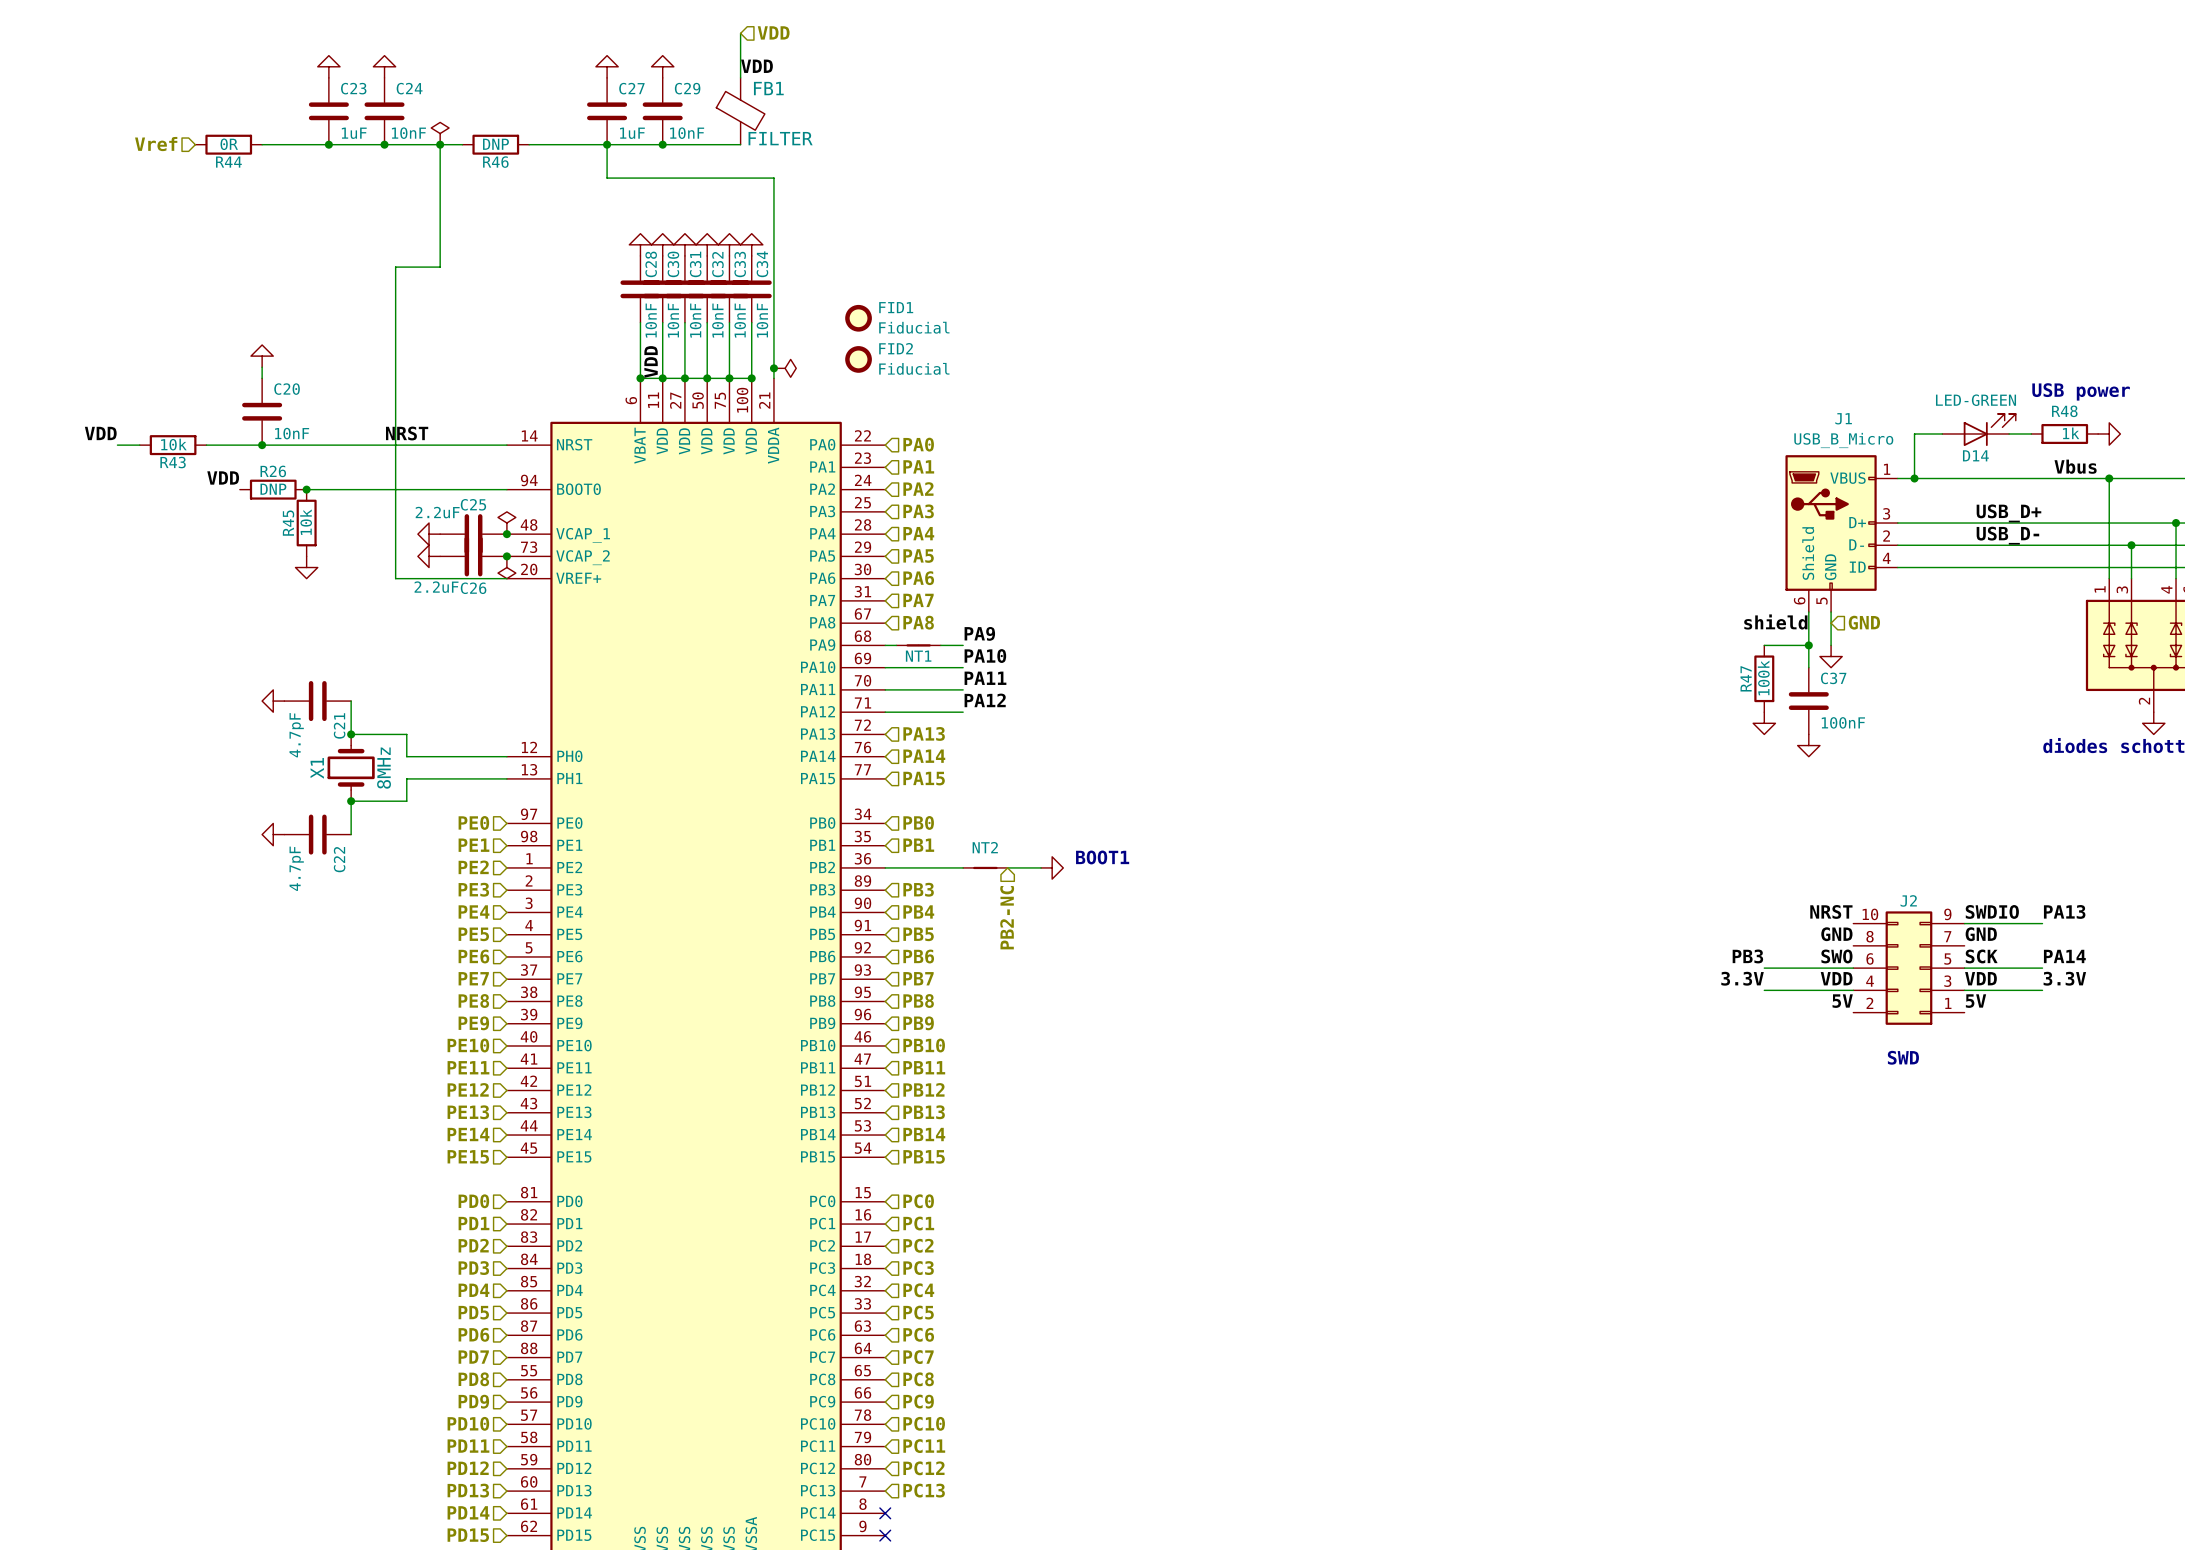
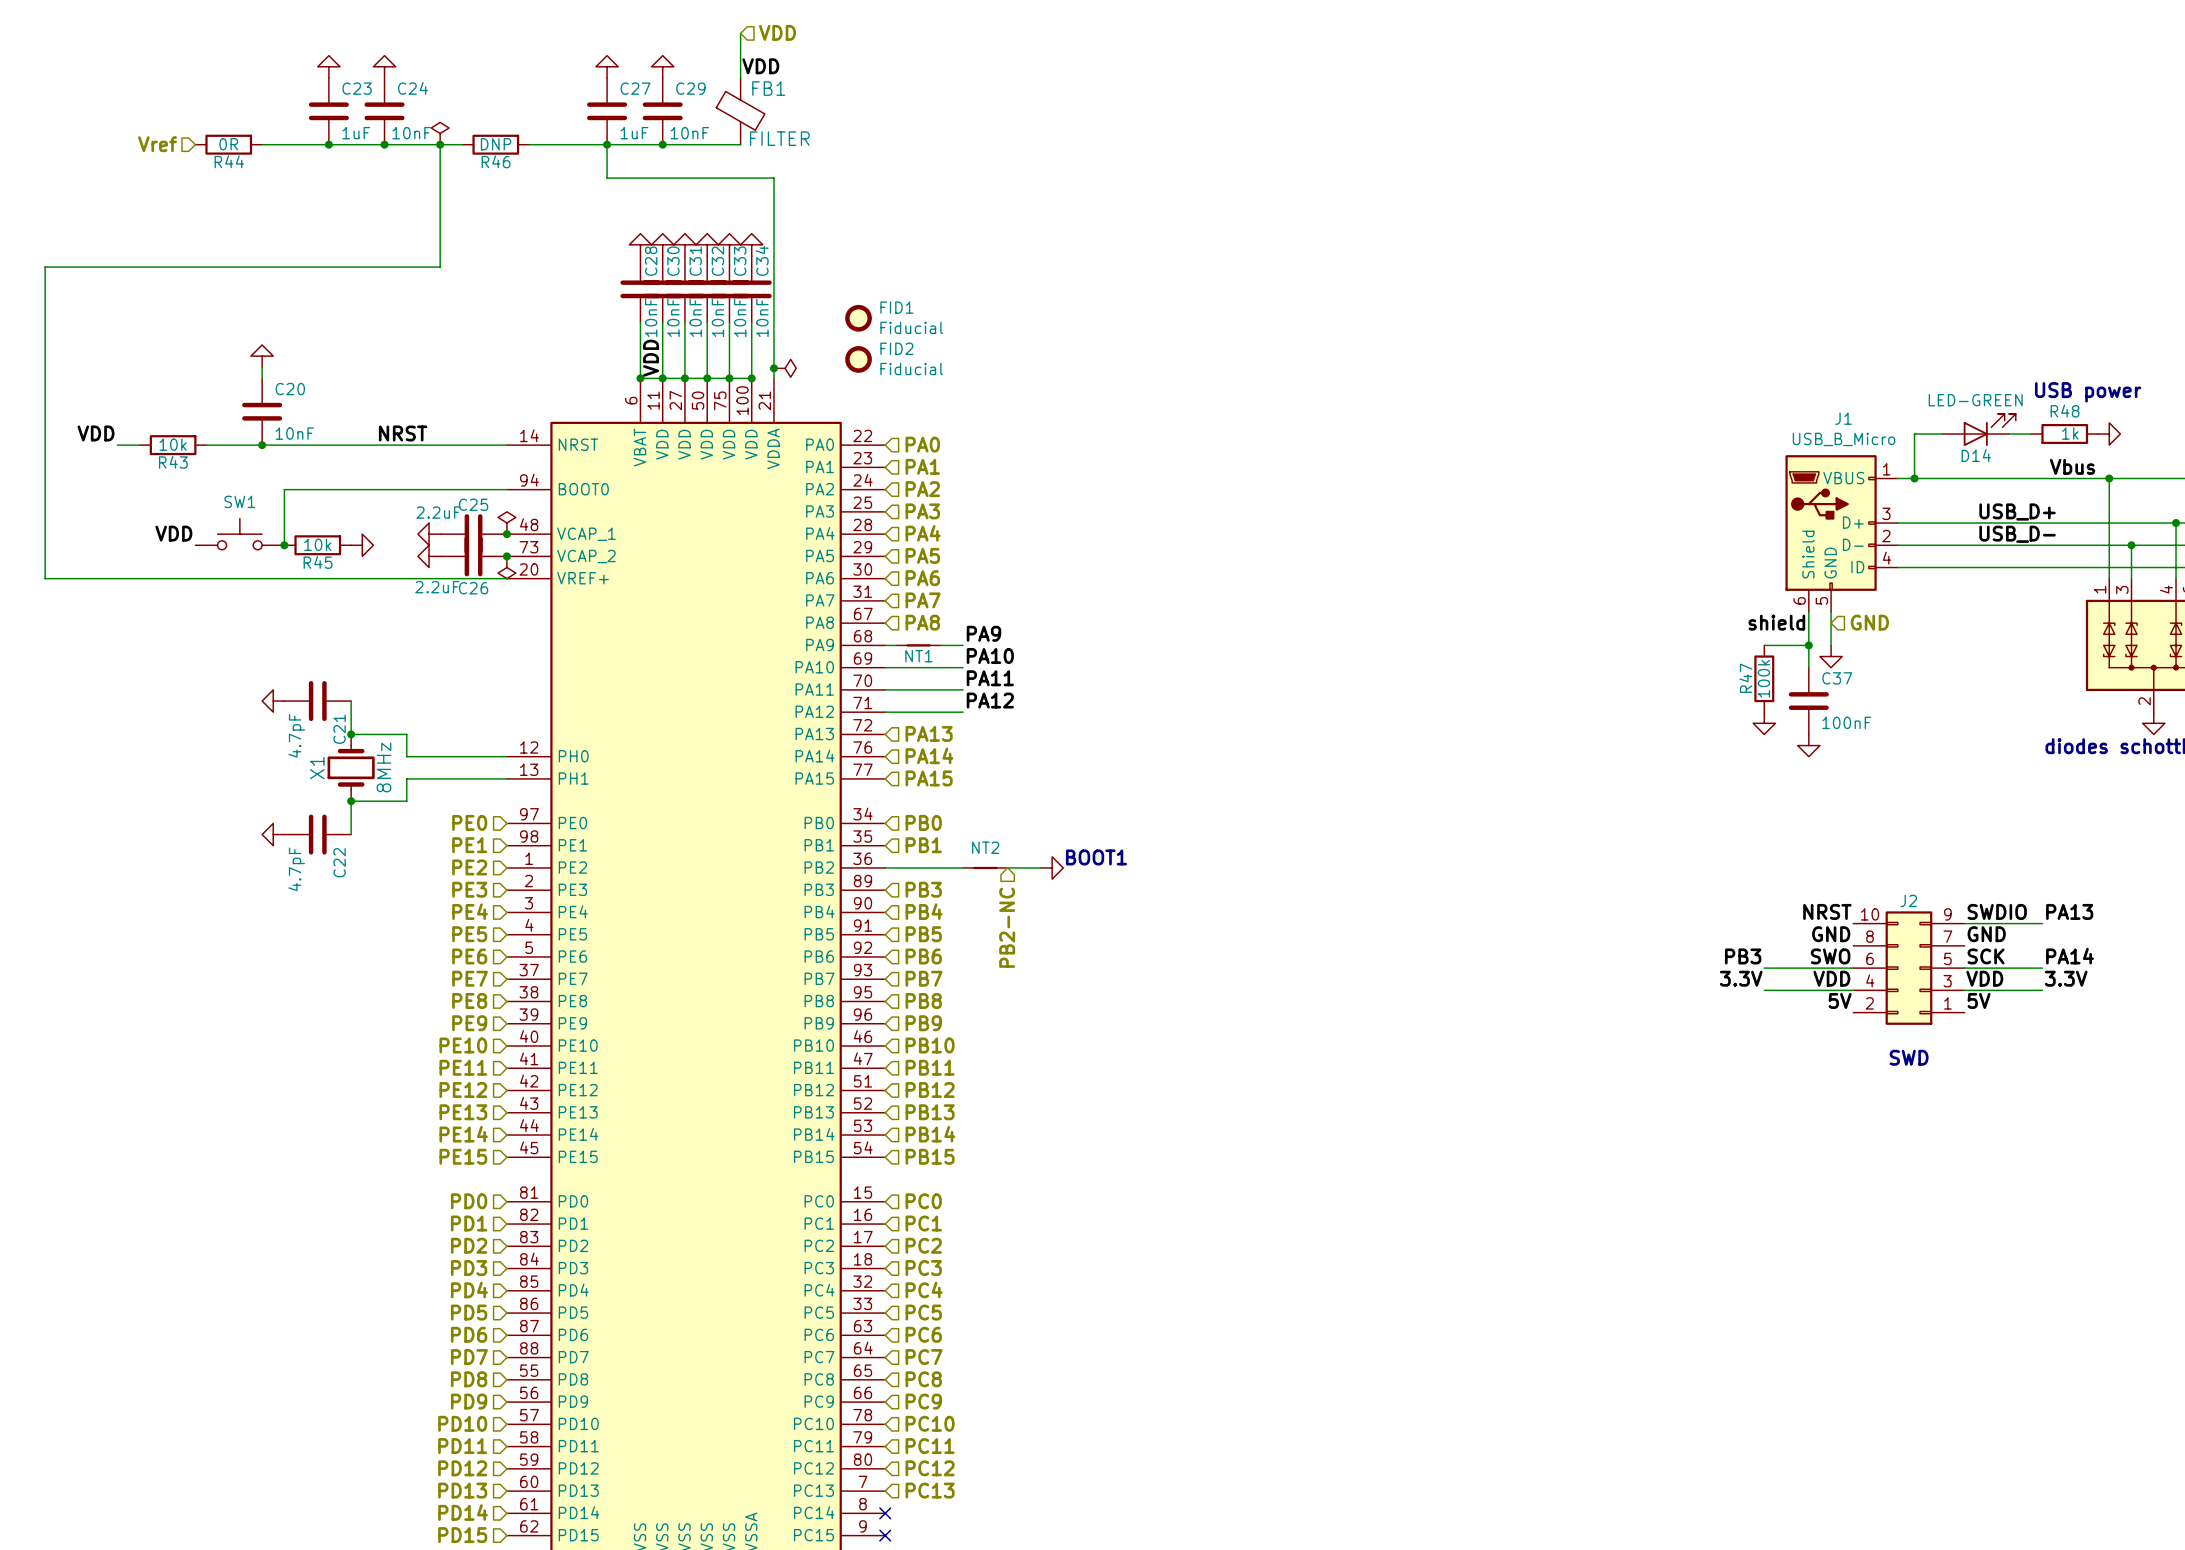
wire: (395, 267) (395, 578) -> (395, 267) (45, 267) (45, 578) (395, 578)
label position: VDD (223, 477) -> VDD (173, 533)
R26: DNP (273, 489) -> none
wire: none -> (306, 489) (284, 489) (284, 545)
junction: (306, 489) -> none
R45 name position: R45 (288, 523) -> R45 (318, 562)
R45 rotation: 0° (306, 523) -> 90° clockwise (317, 545)
SW1: none -> (239, 534)
junction: none -> (284, 545)
power symbol rotation: 0° (306, 567) -> 90° counterclockwise (362, 545)
power symbol position: (306, 567) -> (362, 545)

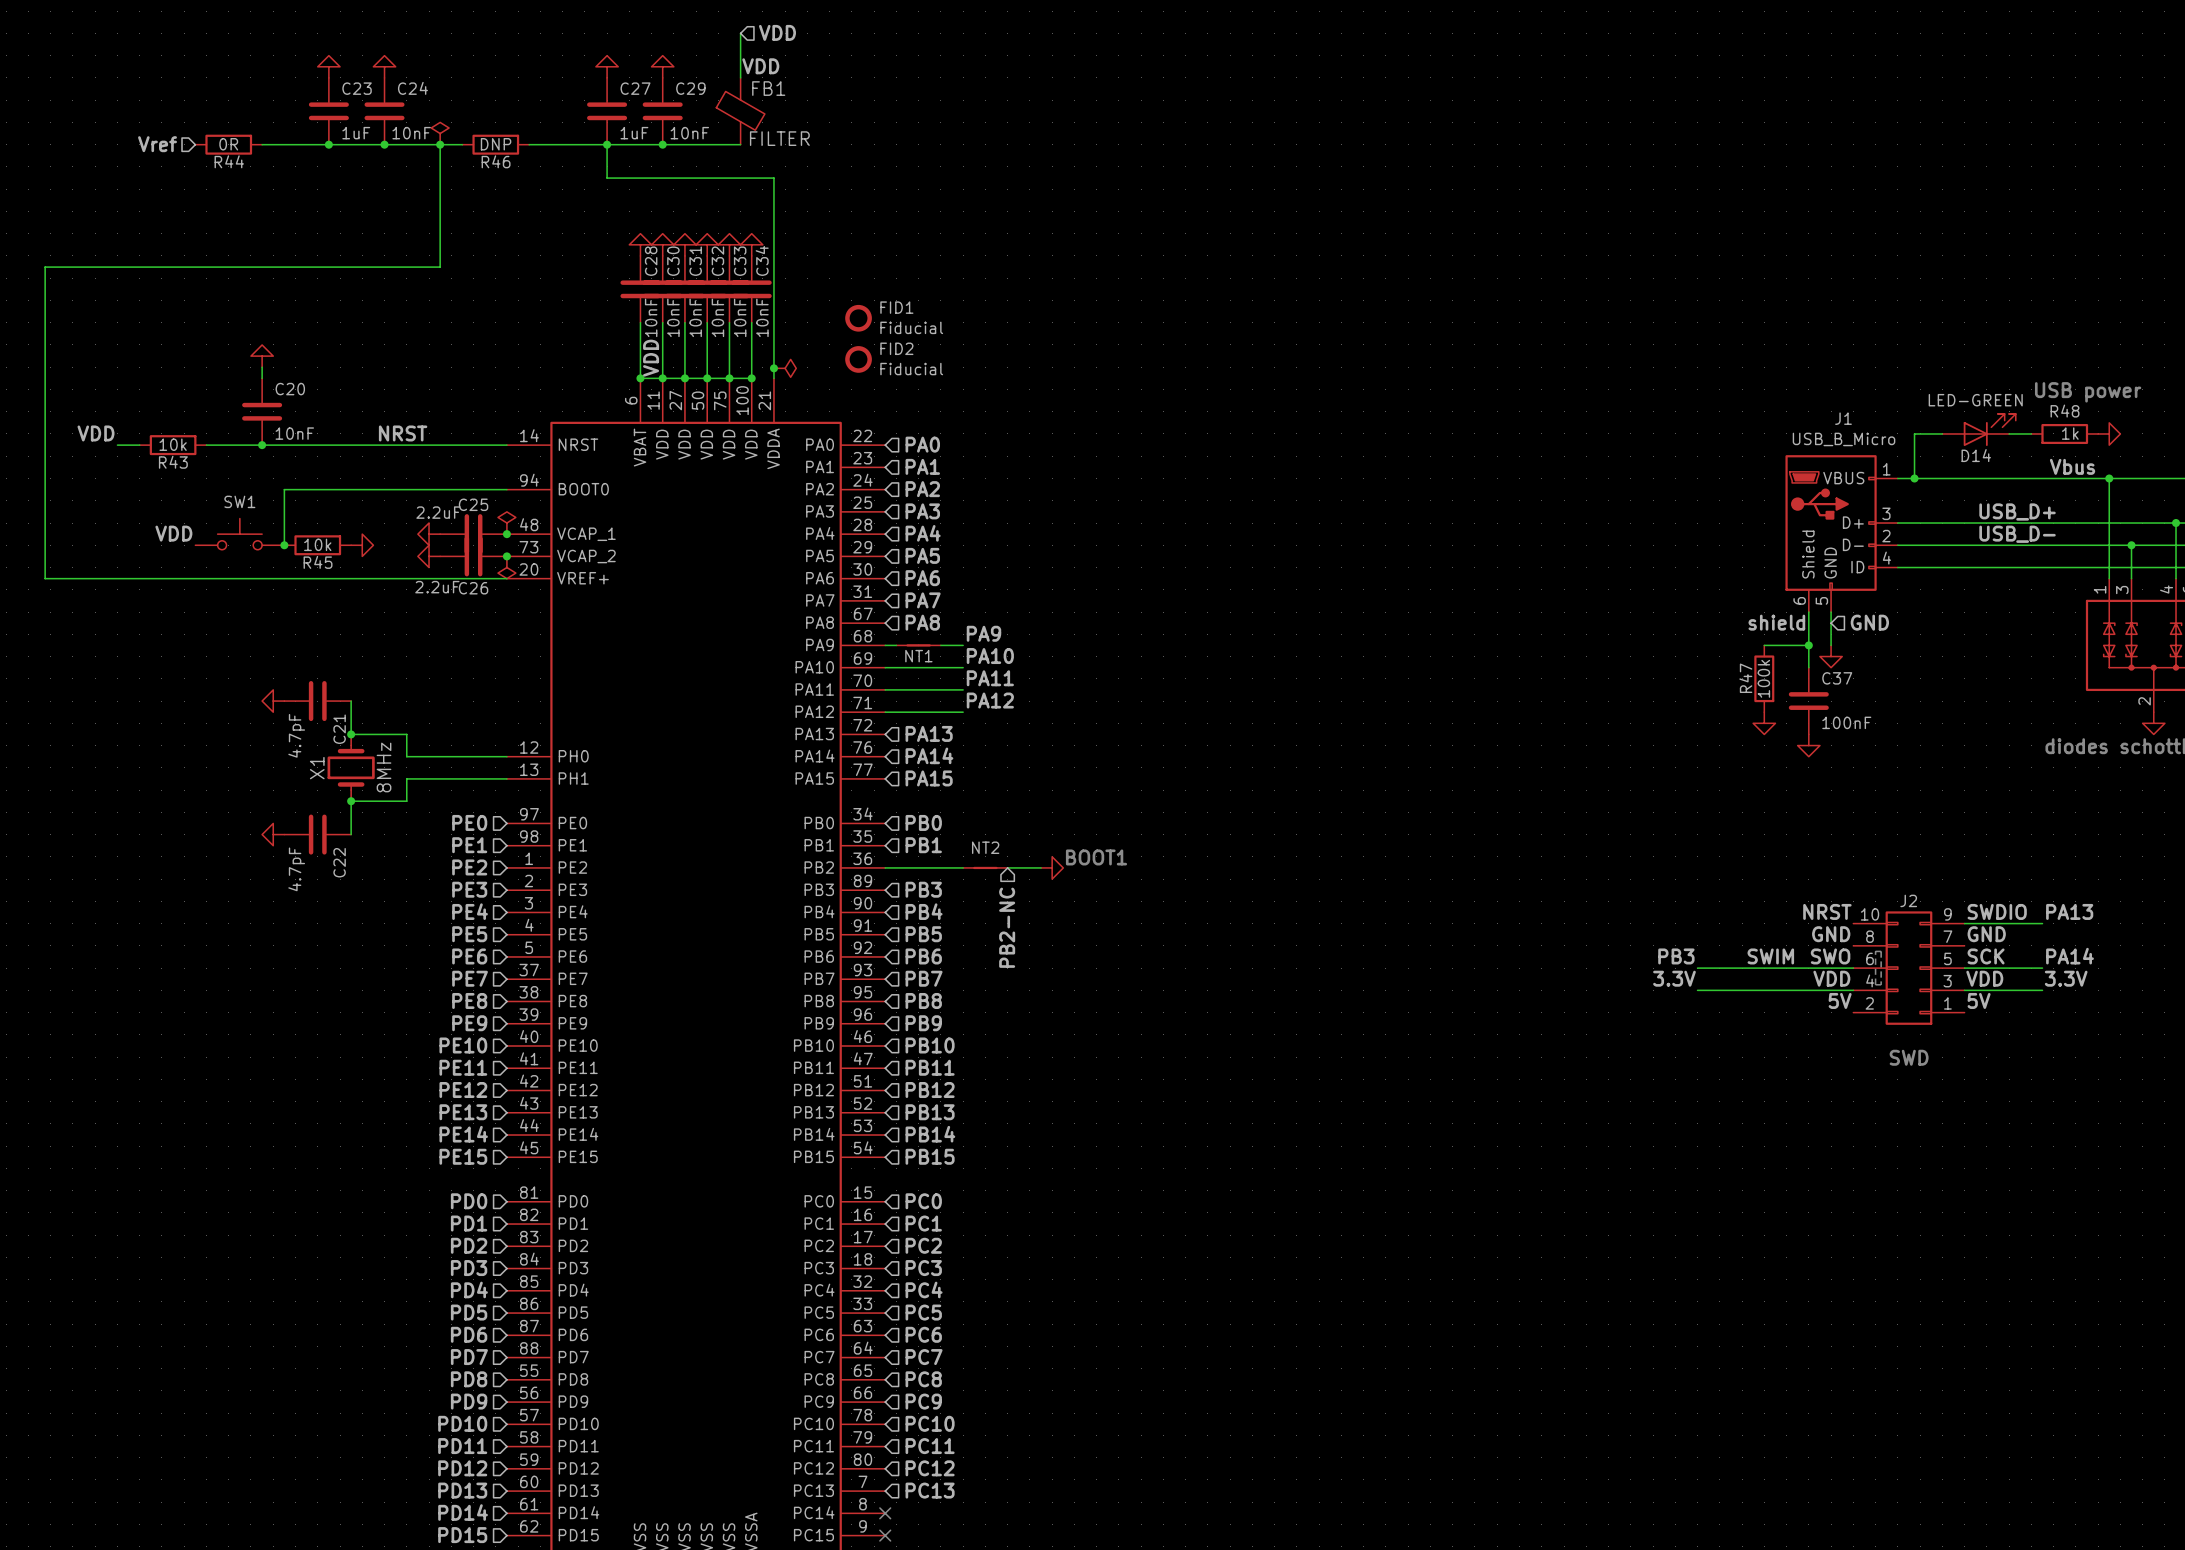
line: none -> (1875, 951) (1881, 951) (1881, 984) (1875, 984) (1875, 951)
label position: PB3 (1743, 956) -> PB3 (1676, 956)
label: none -> SWIM (1770, 956)
wire: none -> (1697, 968) (1764, 968)
label position: 3.3V (1741, 978) -> 3.3V (1674, 978)
wire: none -> (1697, 990) (1764, 990)

